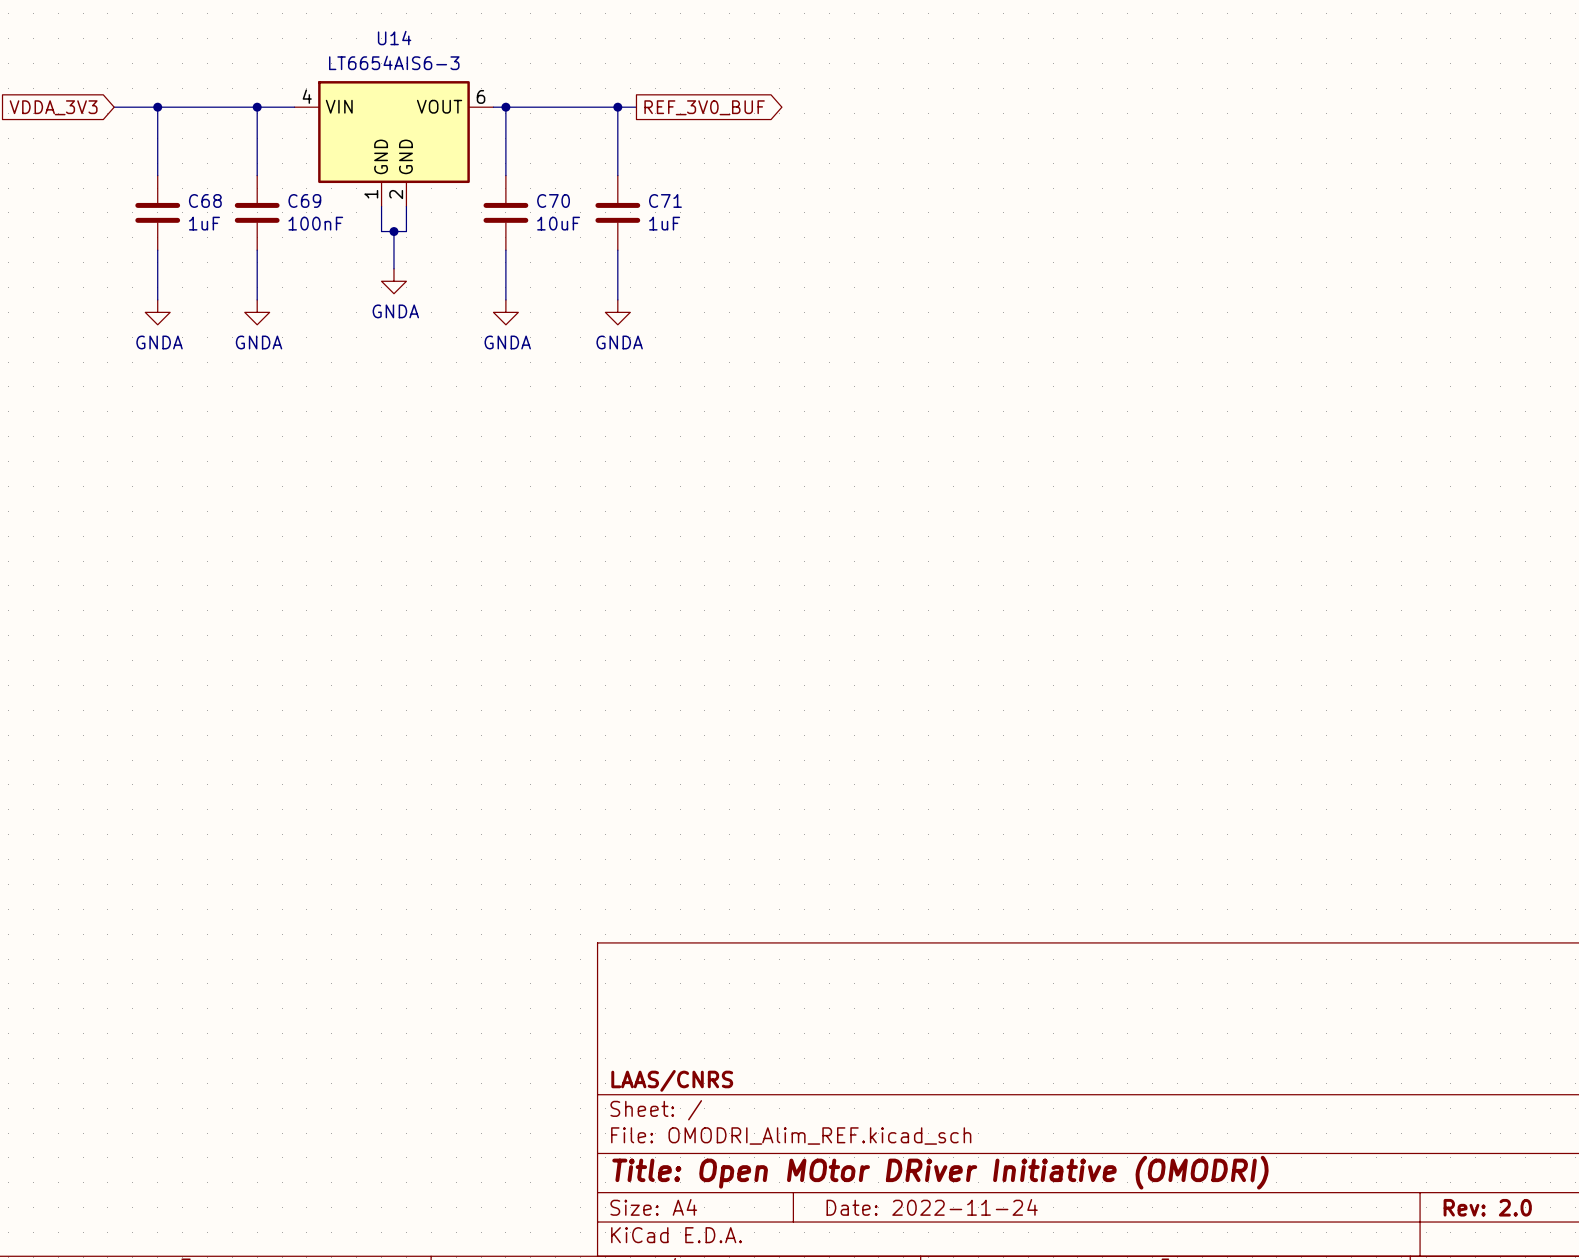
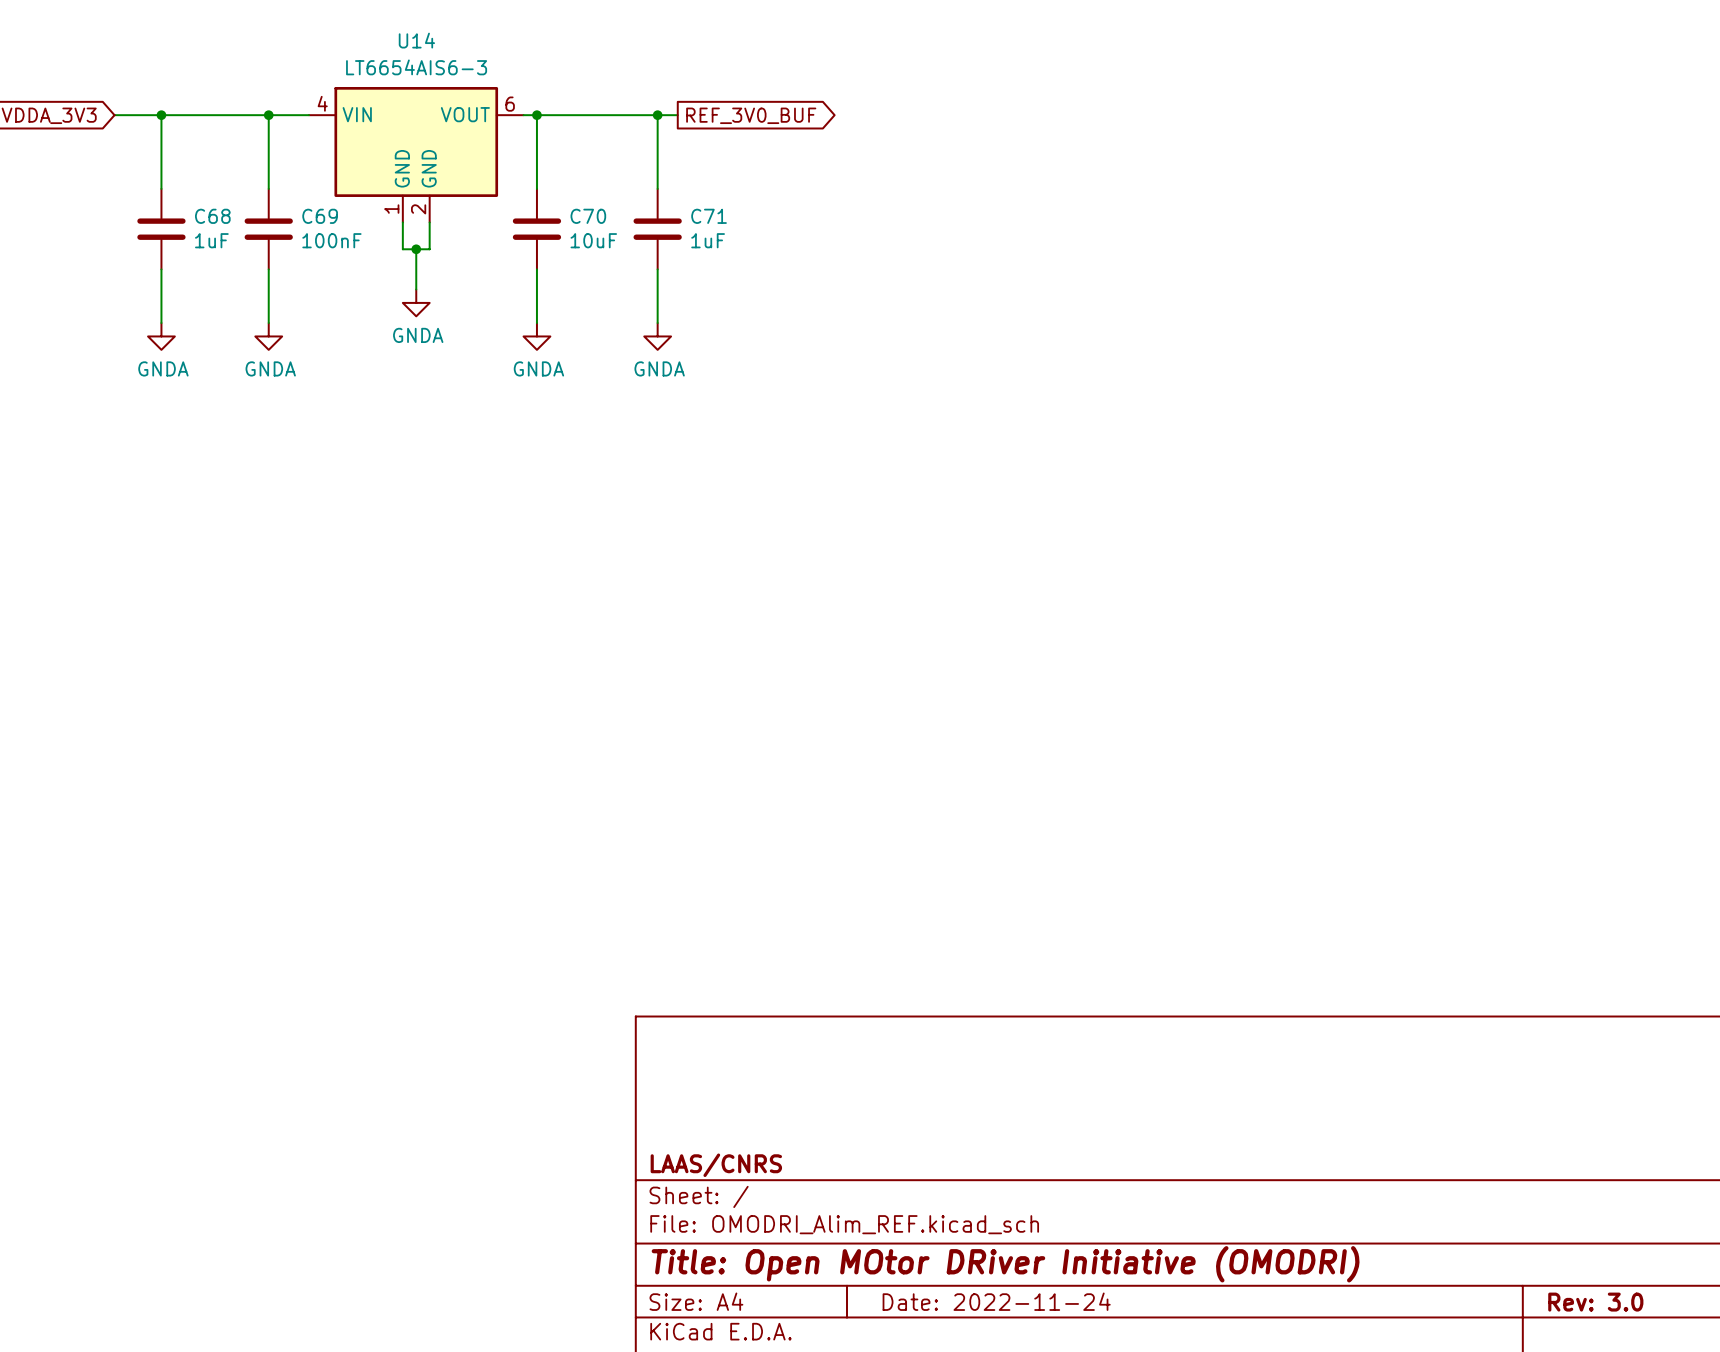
title block: Rev: 2.0 (1487, 1207) -> Rev: 3.0 (1595, 1302)

